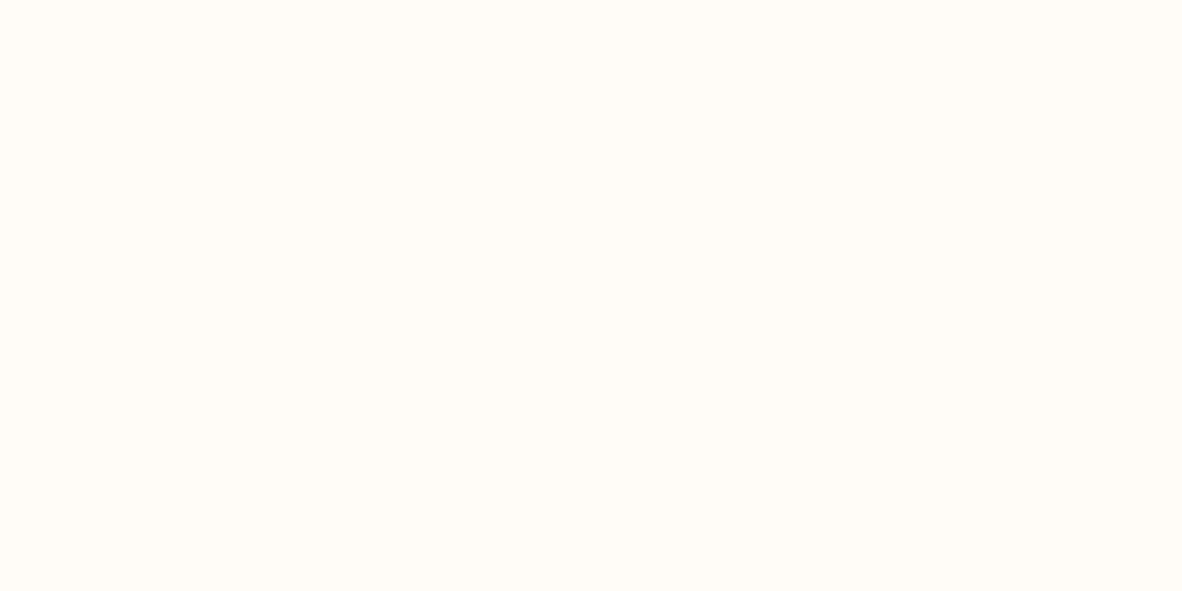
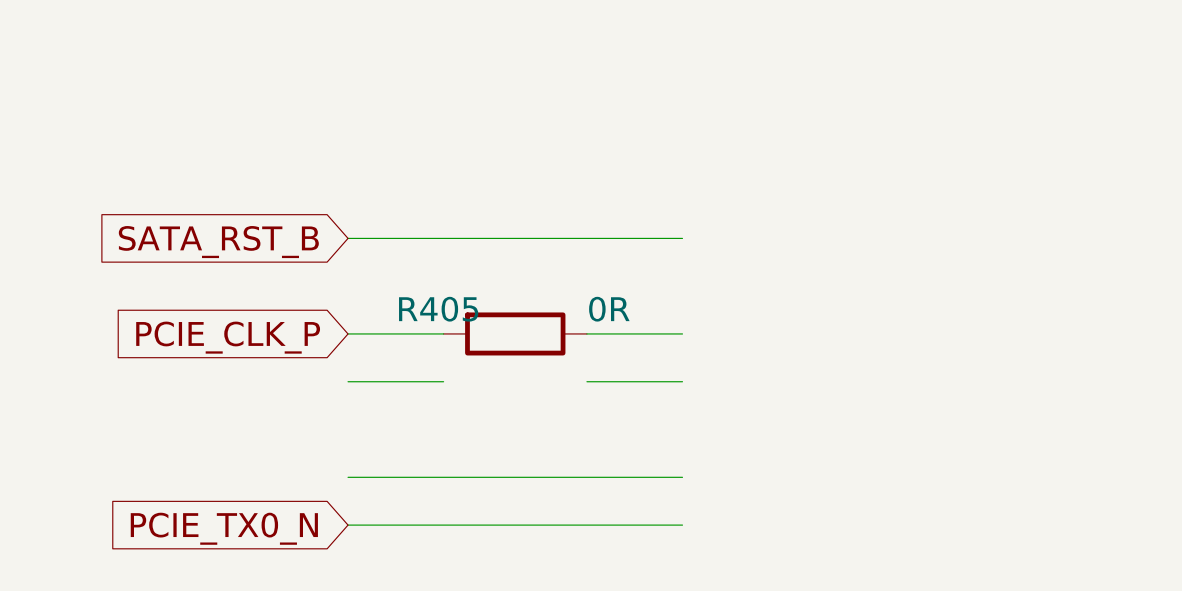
wire: none -> (348, 238) (682, 238)
global label: none -> SATA_RST_B (218, 242)
wire: none -> (348, 333) (443, 333)
R405: none -> 0R (515, 333)
wire: none -> (586, 333) (682, 333)
global label: none -> PCIE_CLK_P (228, 337)
wire: none -> (348, 381) (443, 381)
wire: none -> (586, 381) (682, 381)
wire: none -> (348, 477) (682, 477)
wire: none -> (348, 525) (682, 525)
global label: none -> PCIE_TX0_N (224, 528)

